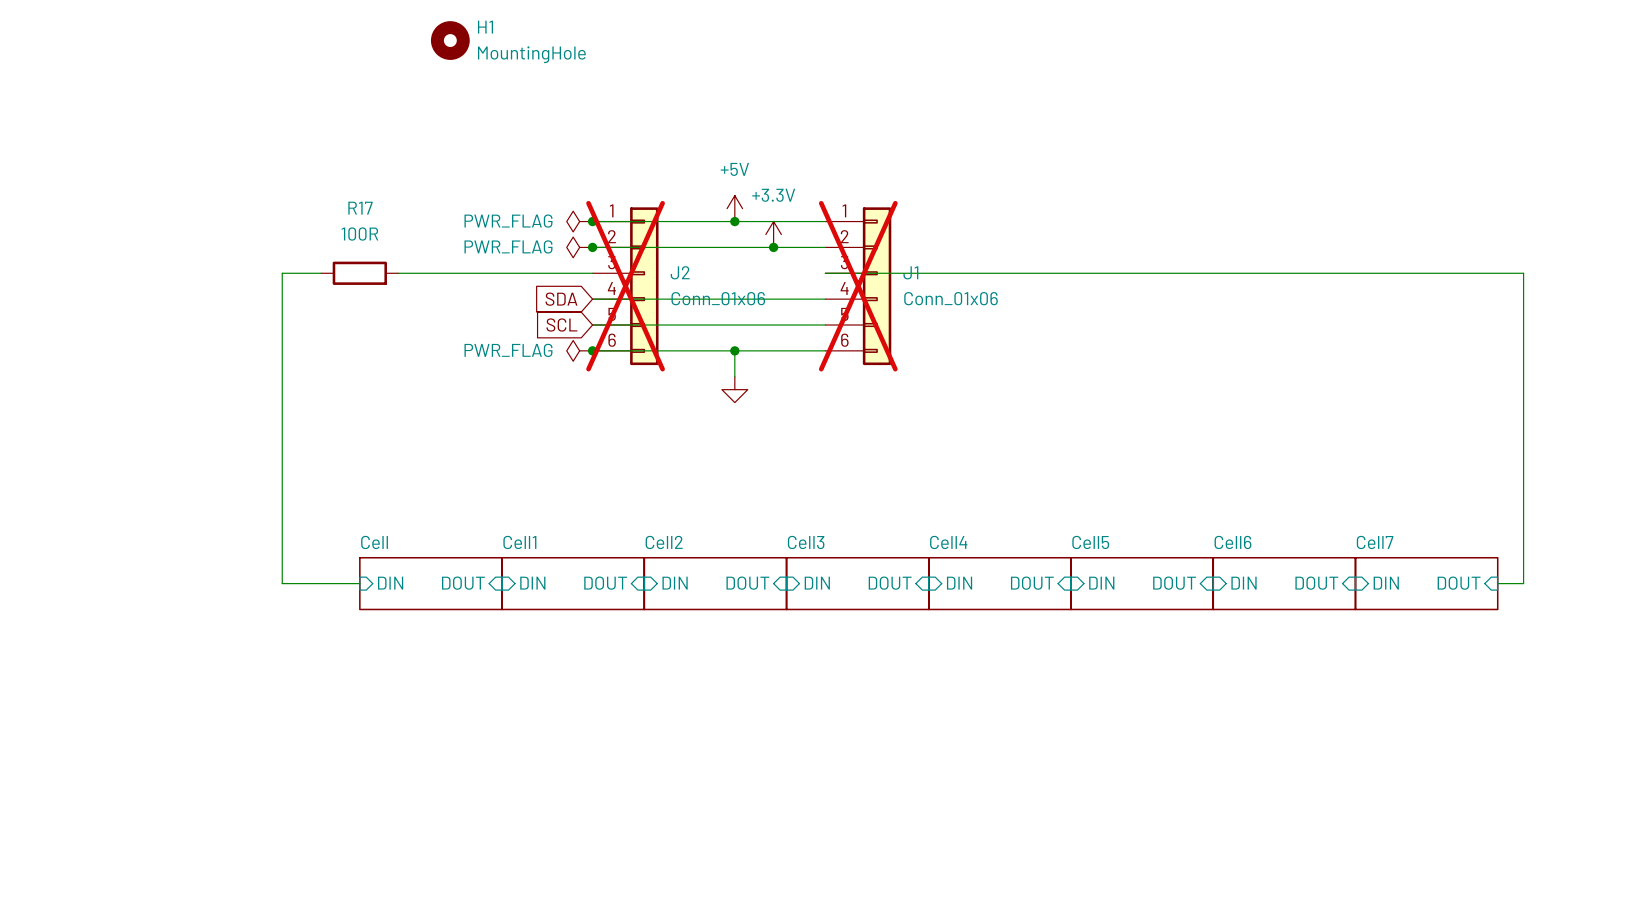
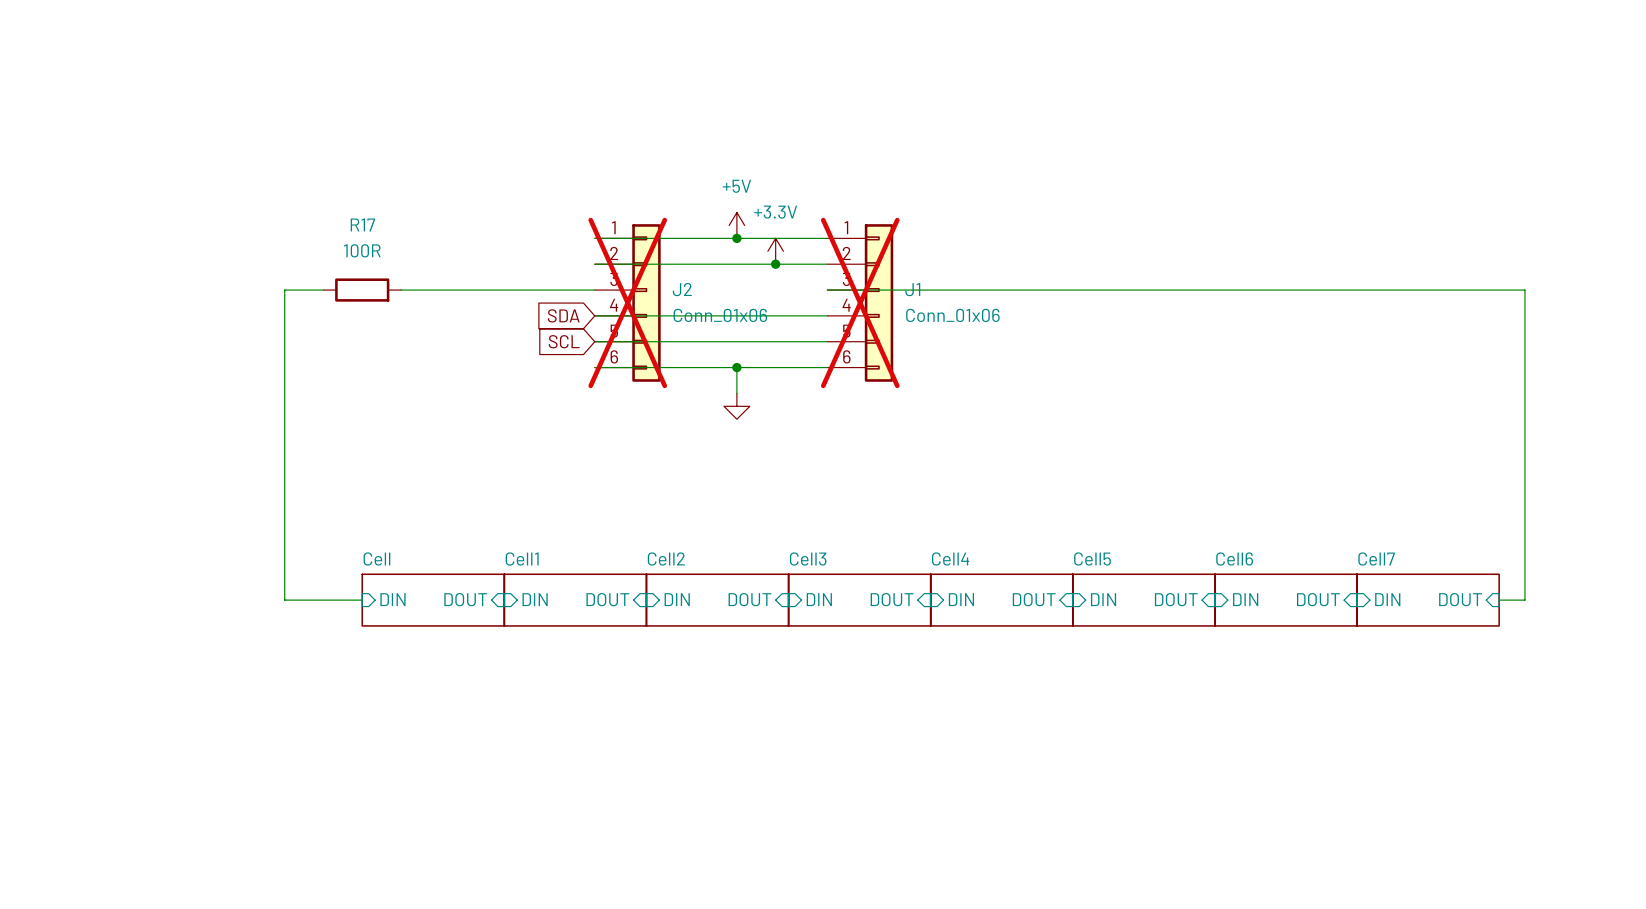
H1: MountingHole (450, 40) -> none
power symbol: PWR_FLAG (579, 221) -> none
junction: (592, 221) -> none
power symbol: PWR_FLAG (579, 247) -> none
junction: (592, 247) -> none
power symbol: PWR_FLAG (579, 350) -> none
junction: (592, 350) -> none

